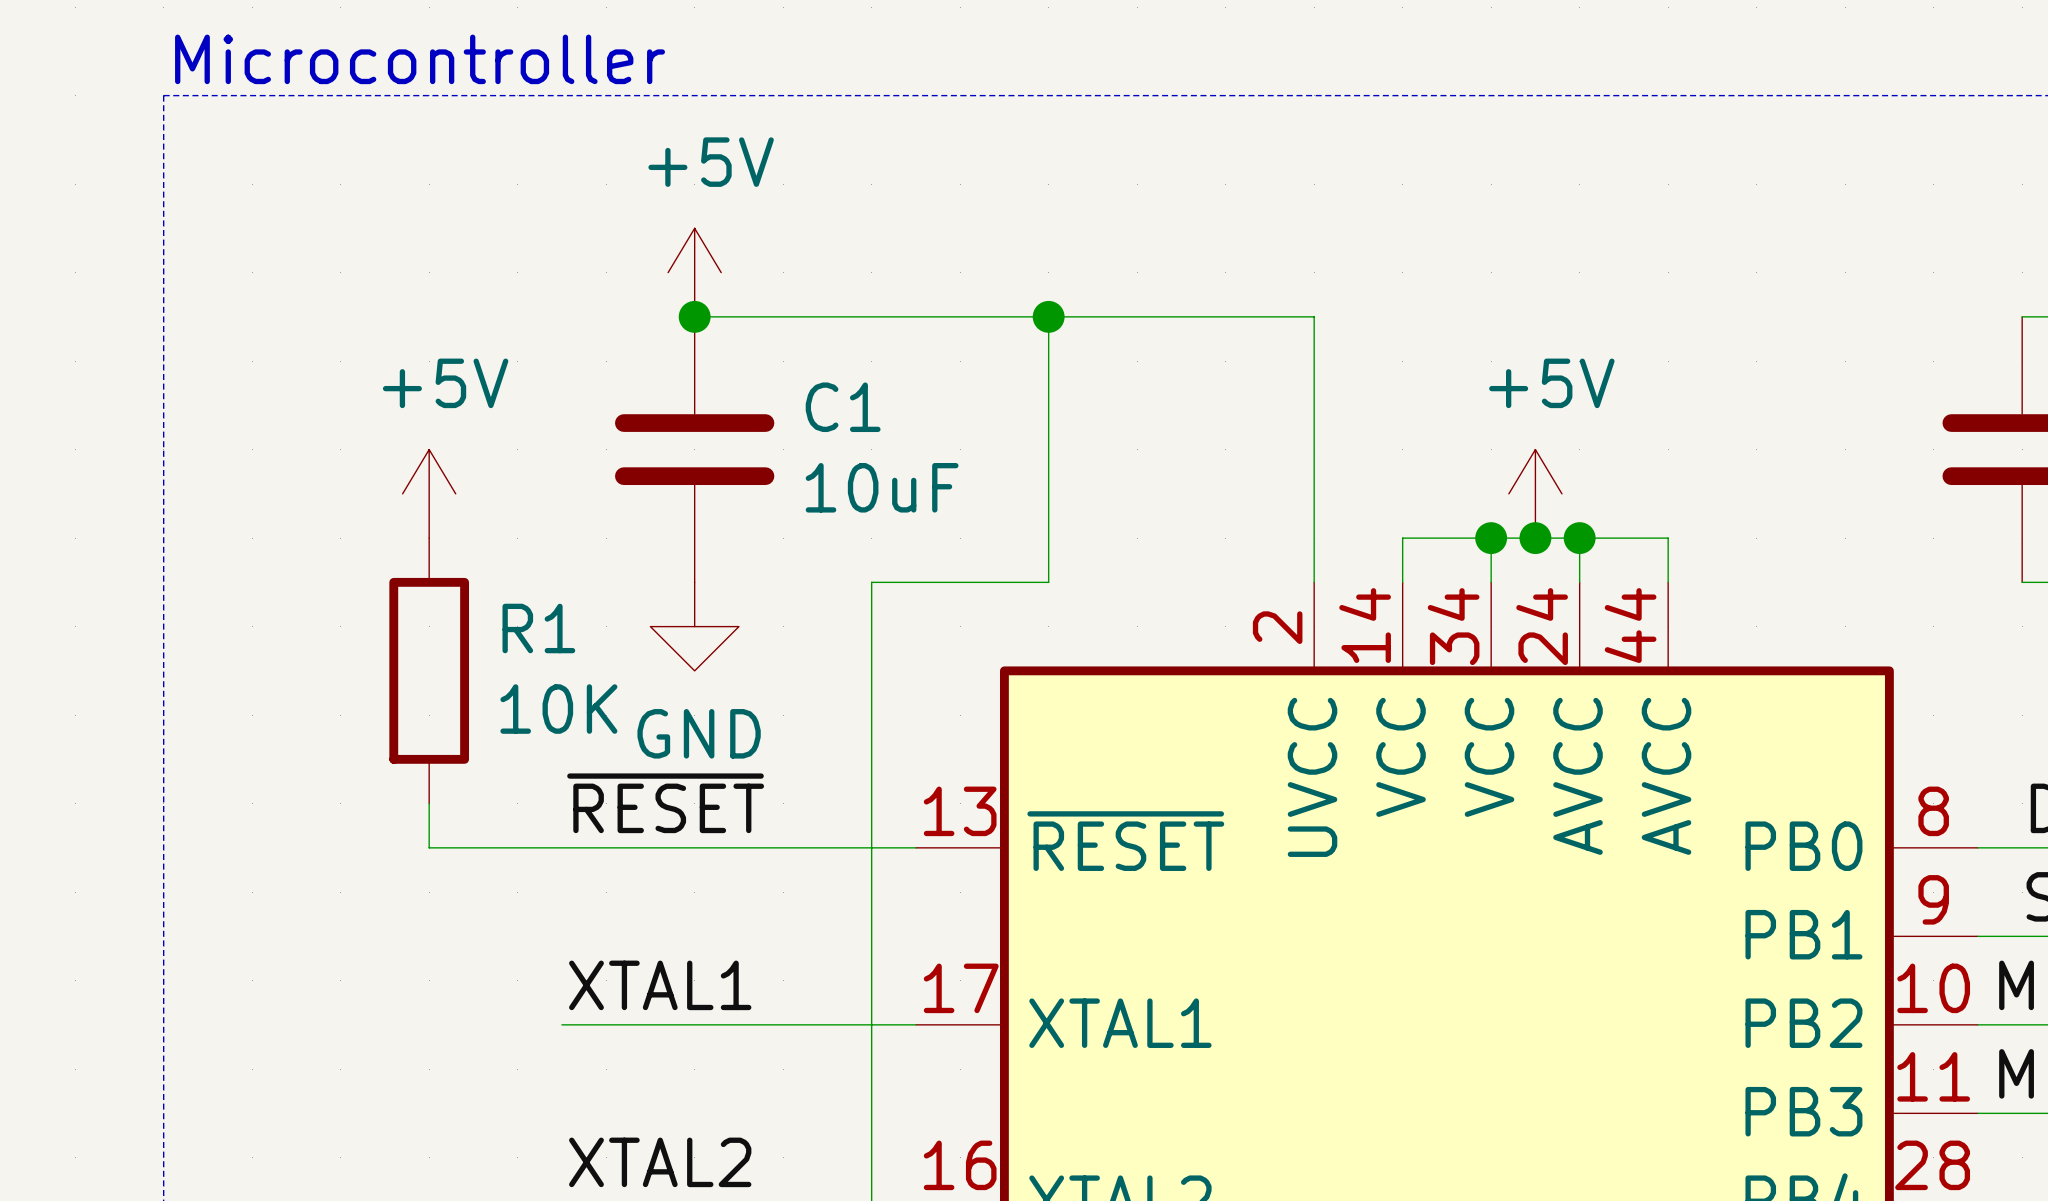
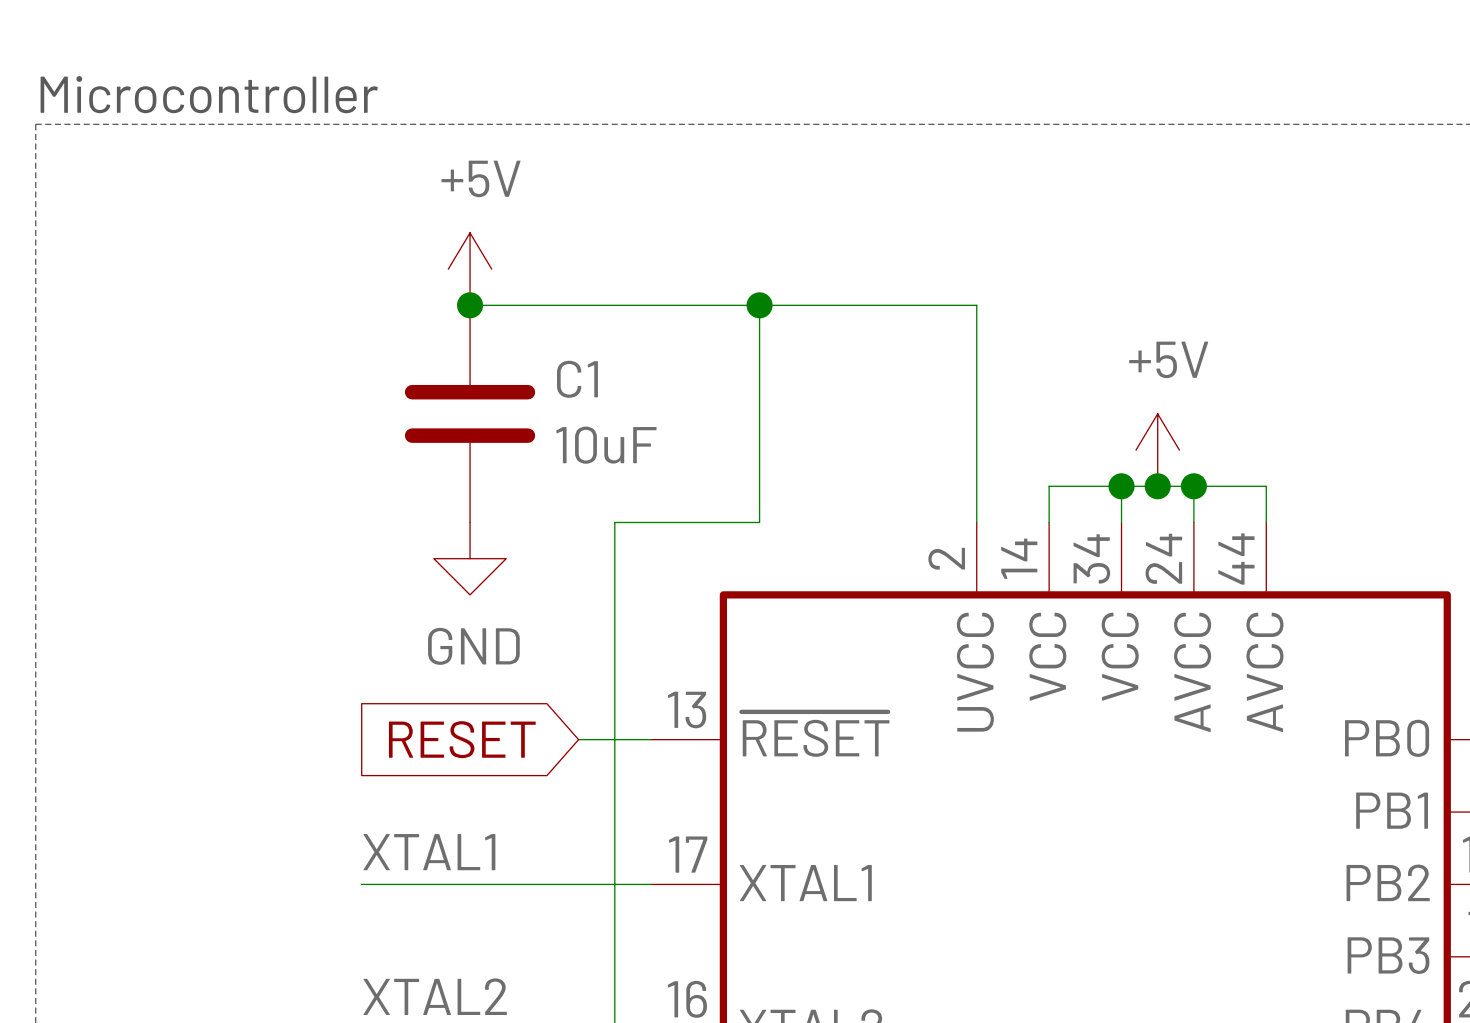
power symbol: +5V (429, 493) -> none
R1: 10K (429, 670) -> none
wire: (429, 803) (429, 847) (827, 847) -> none
label: ~{RESET} (665, 803) -> none
global label: none -> RESET (462, 739)

